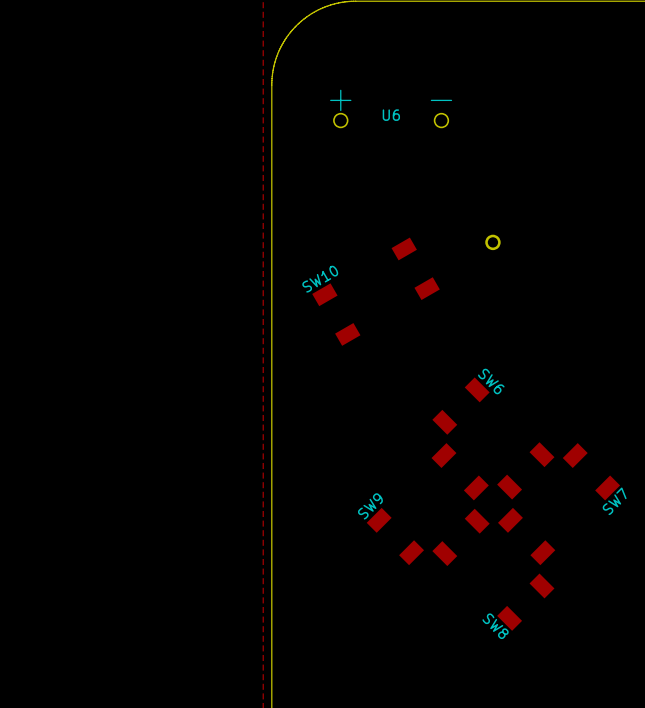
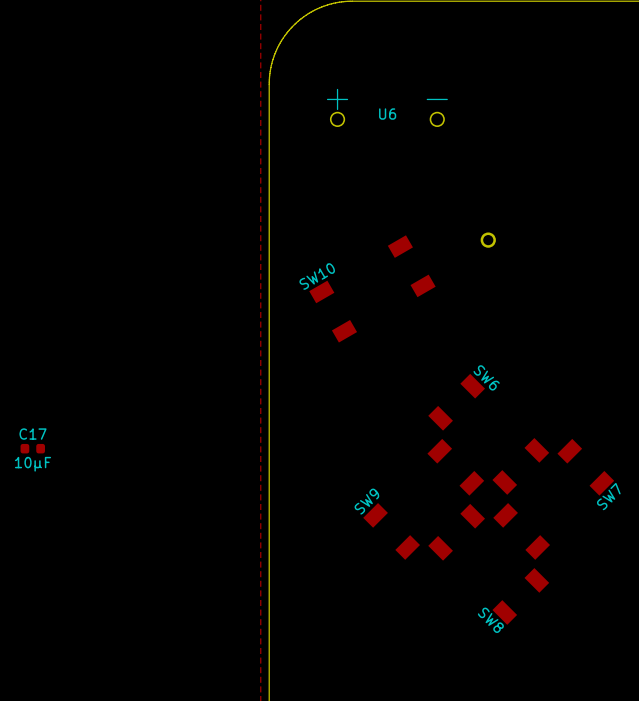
C17: none -> 10μF (32, 448)

